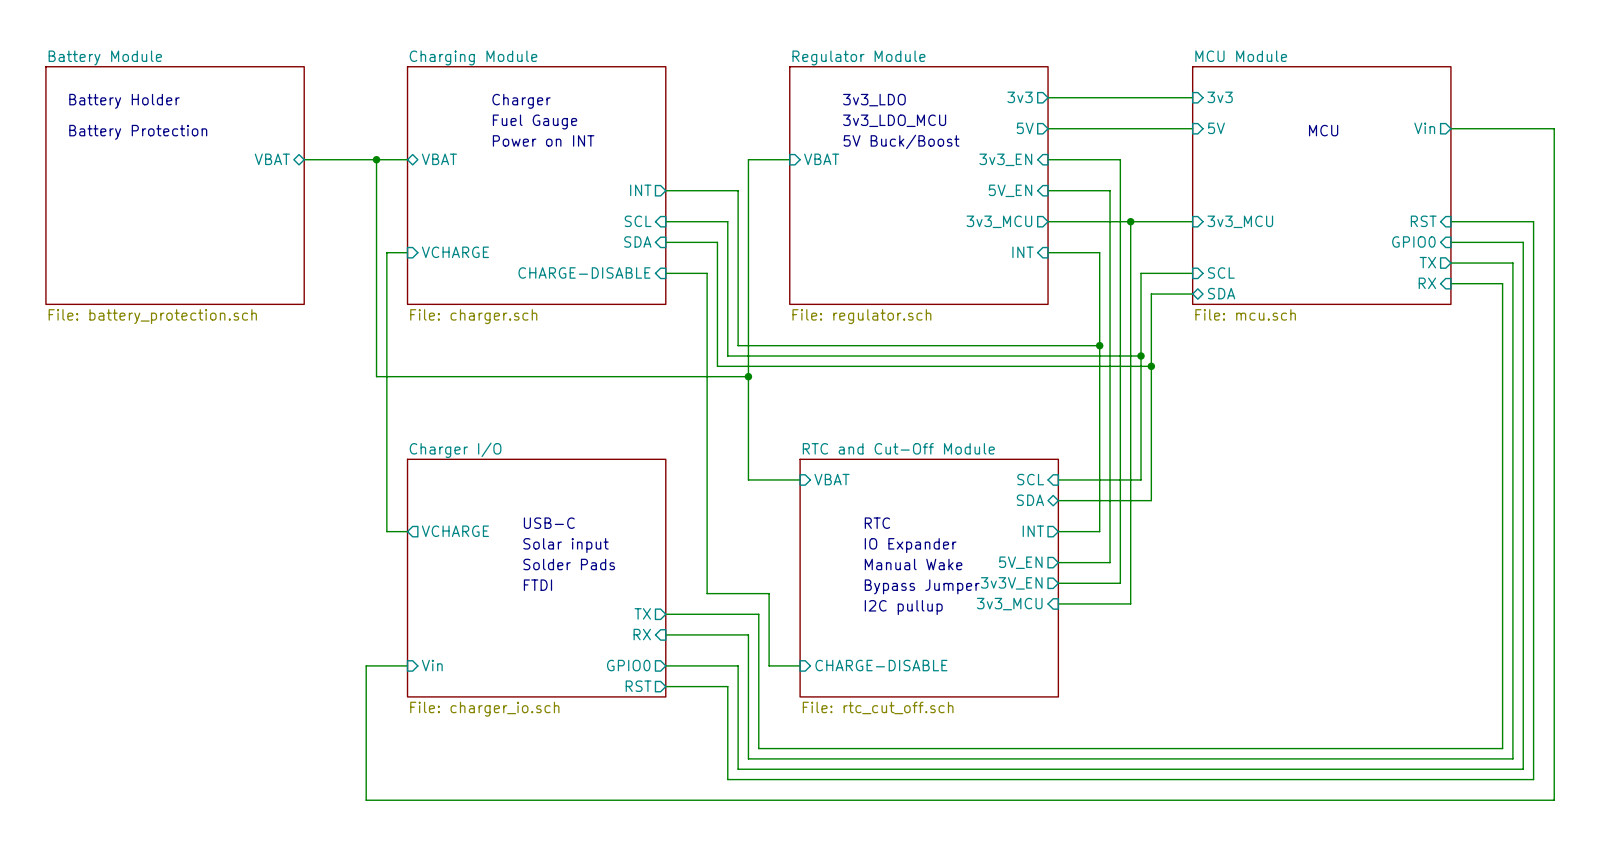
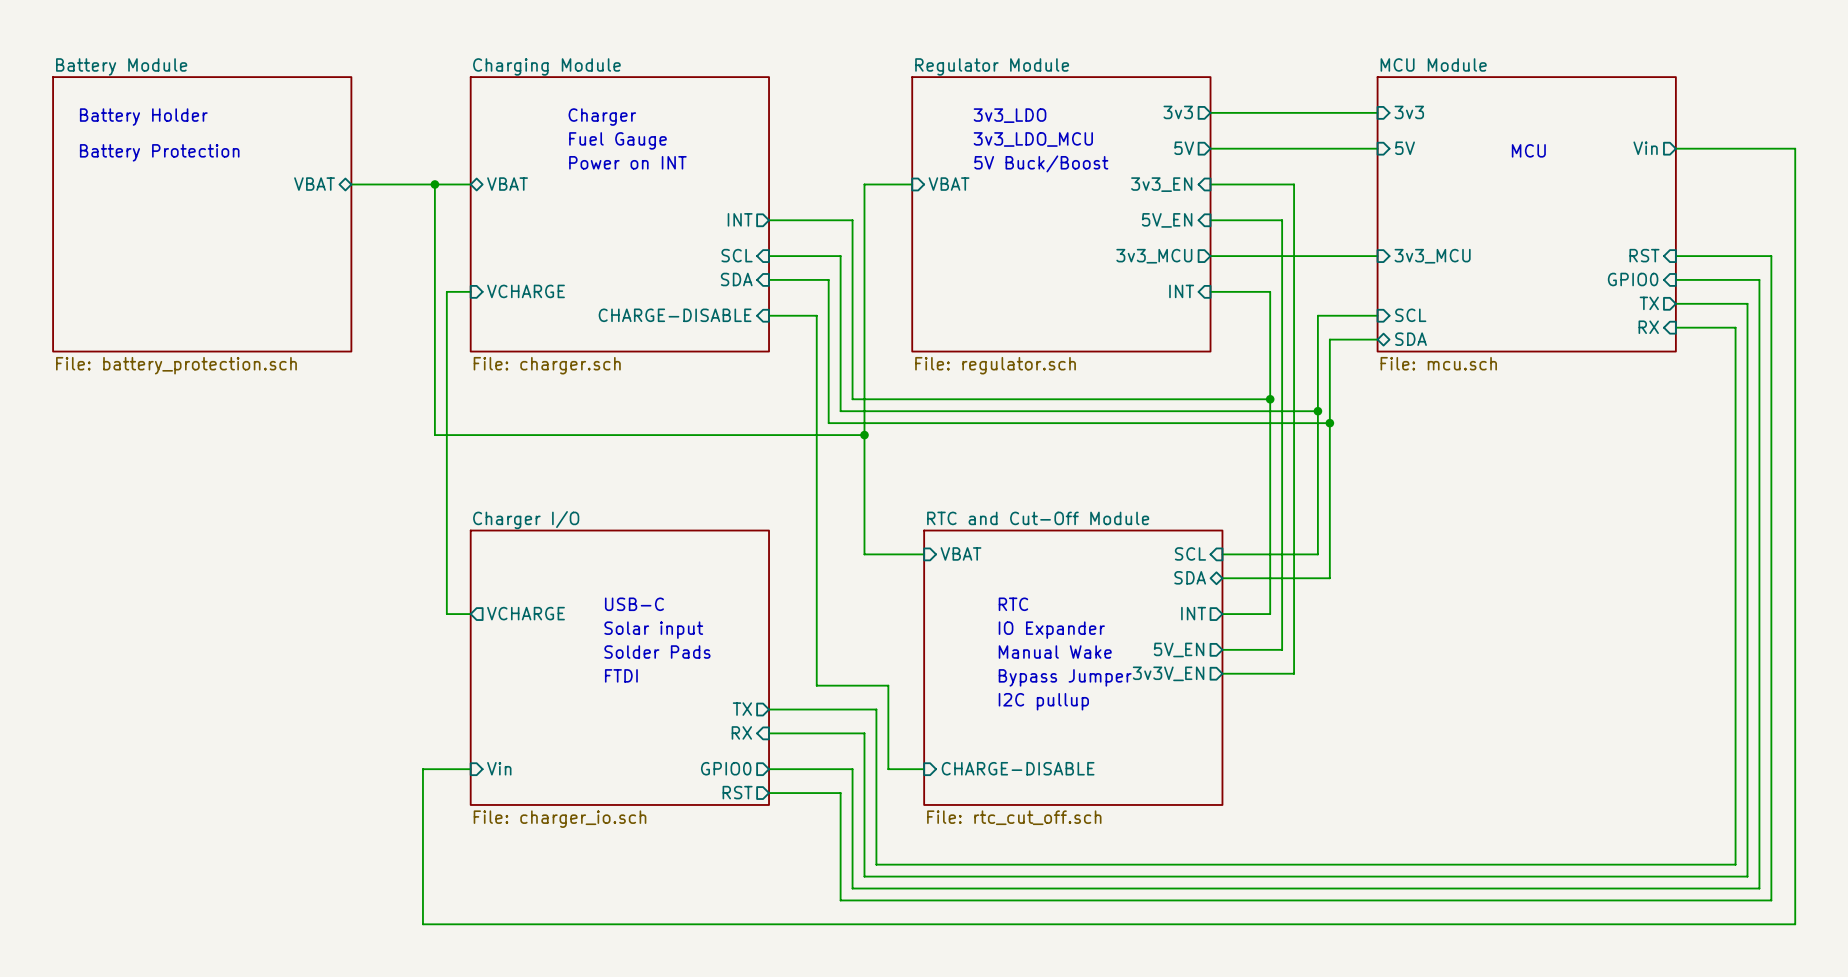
wire: (1130, 221) (1130, 603) (1058, 603) -> none
junction: (1130, 221) -> none
sheet pin: 3v3_MCU (1009, 604) -> none

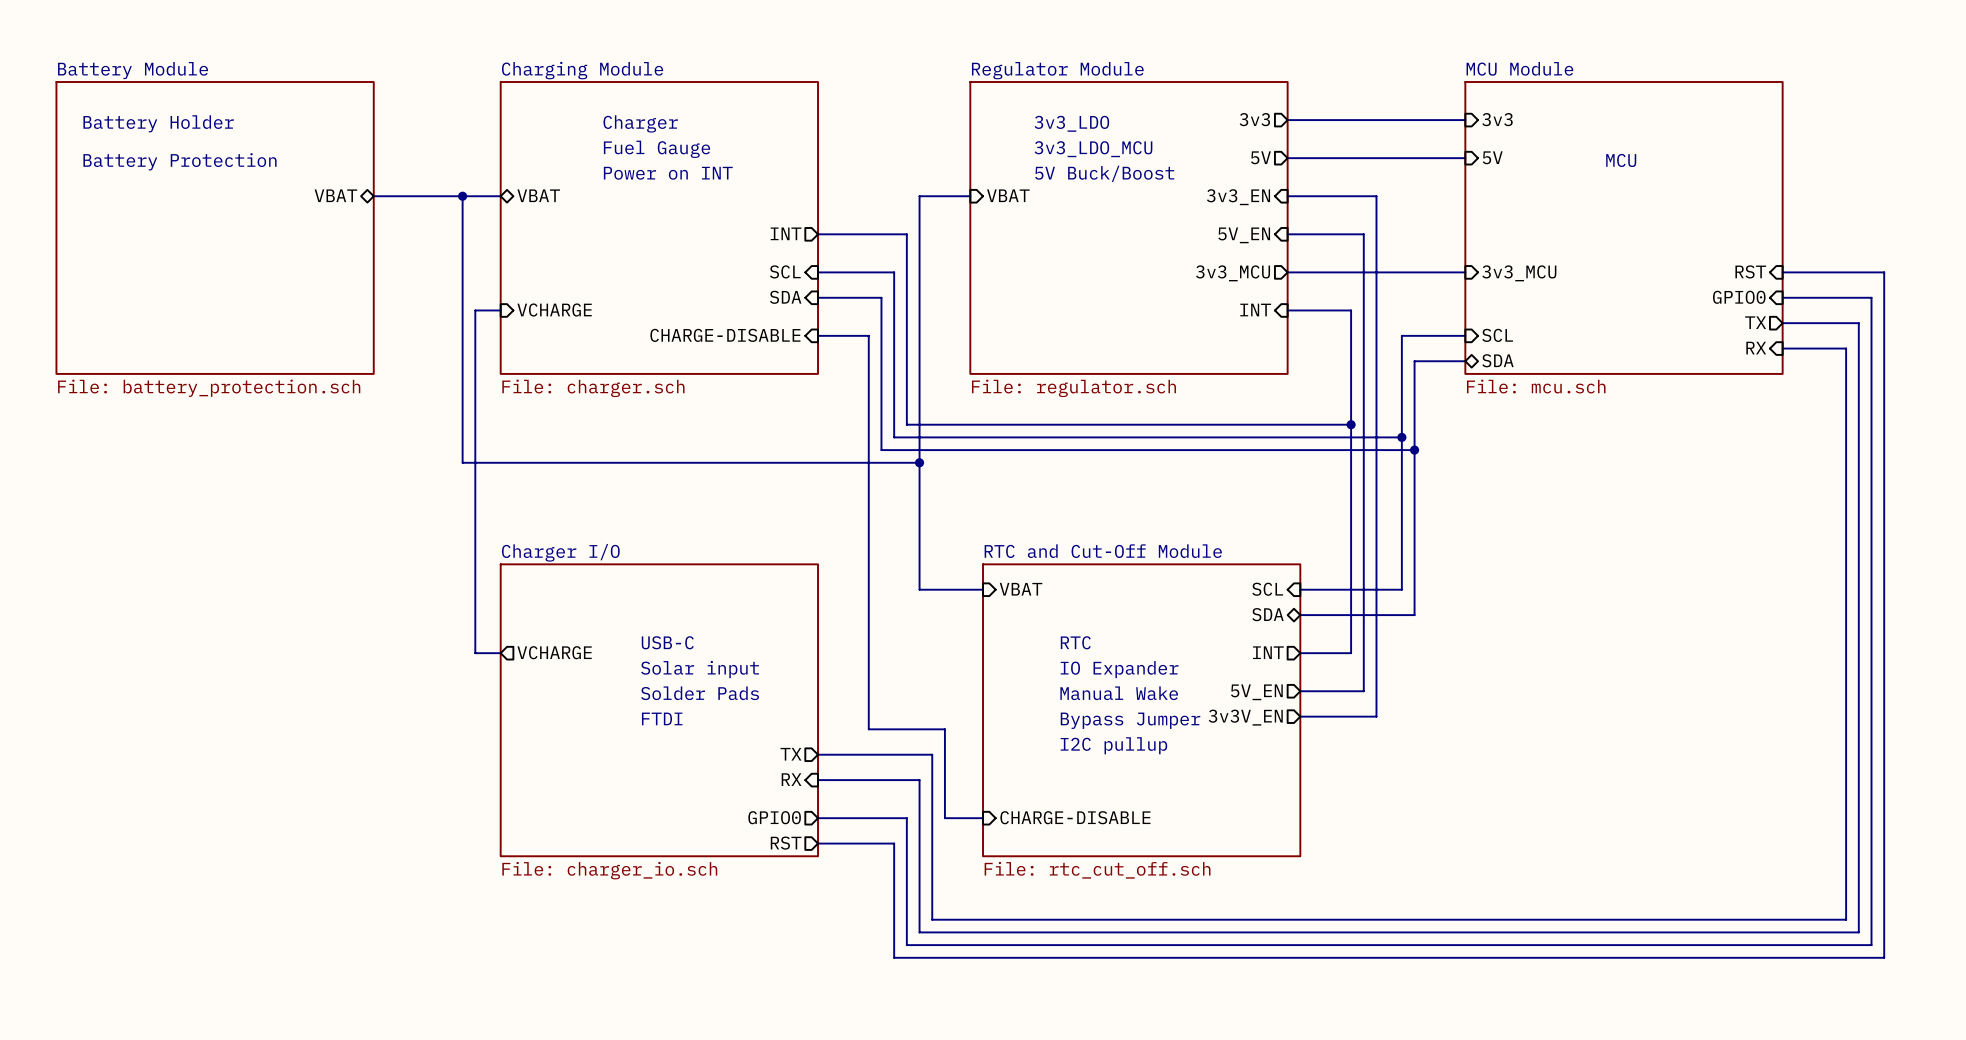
sheet pin: Vin (1645, 148) -> none
wire: (1675, 148) (1795, 148) (1795, 924) (422, 924) (422, 769) (470, 769) -> none
sheet pin: Vin (499, 768) -> none

